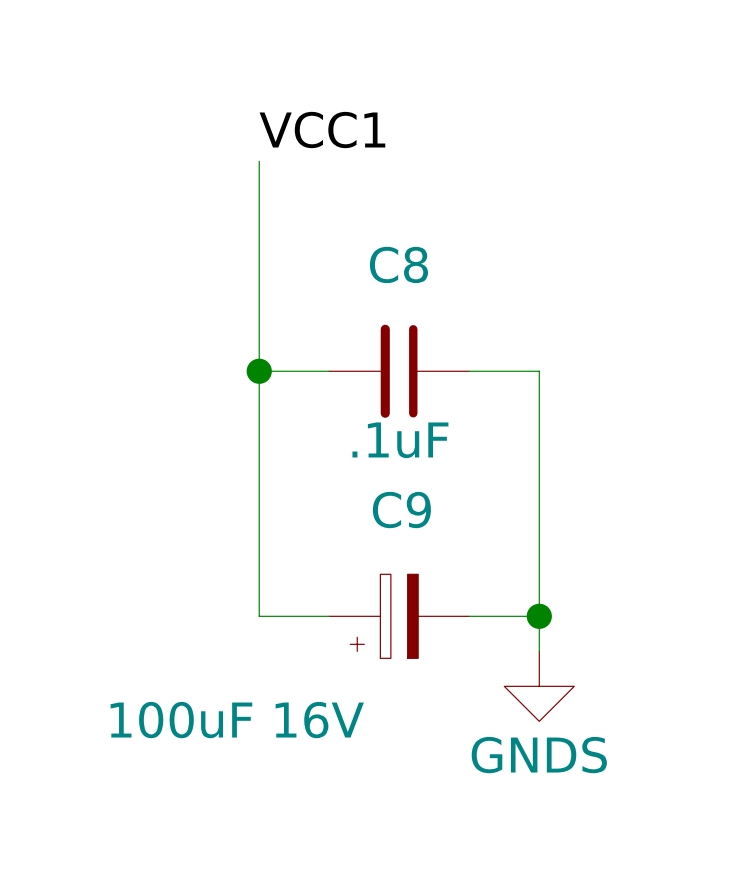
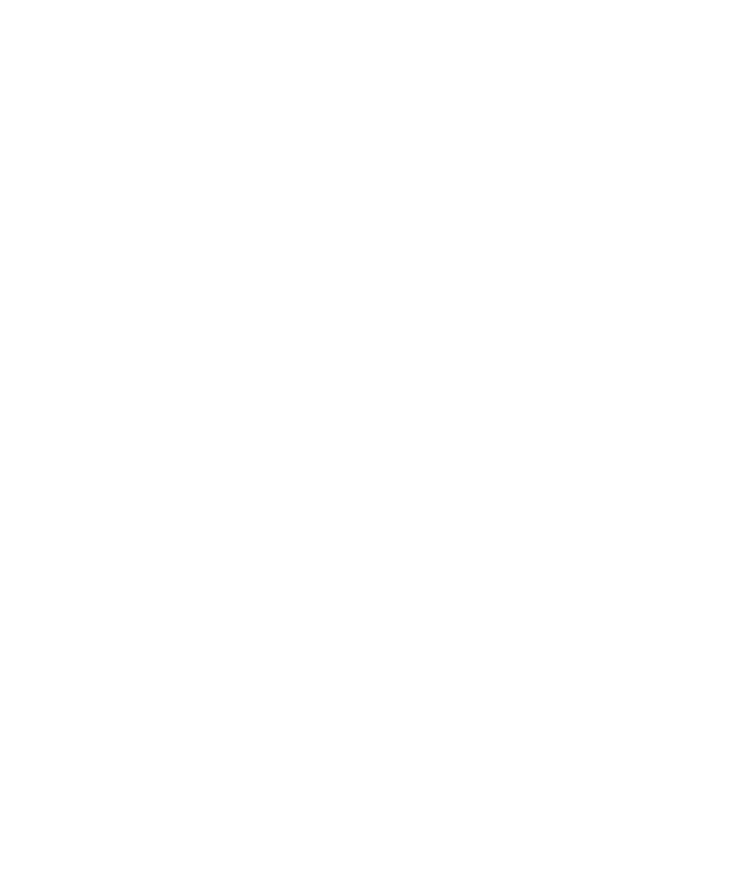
label: VCC1 (322, 130) -> none
wire: (259, 161) (259, 616) (329, 616) -> none
wire: (259, 371) (329, 371) -> none
junction: (259, 371) -> none
C8: .1uF (399, 371) -> none
wire: (469, 371) (539, 371) (539, 651) -> none
C9: 100uF 16V (399, 616) -> none
wire: (469, 616) (539, 616) -> none
junction: (539, 616) -> none
power symbol: GNDS (539, 686) -> none

